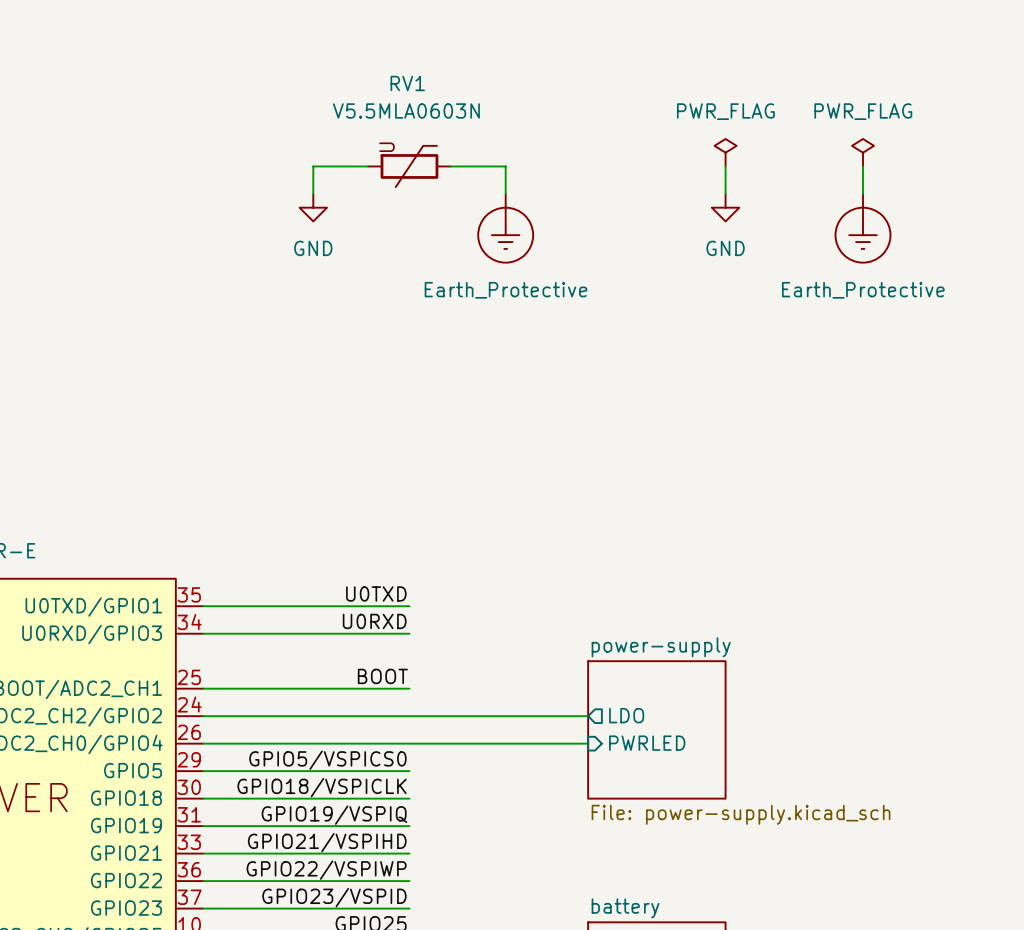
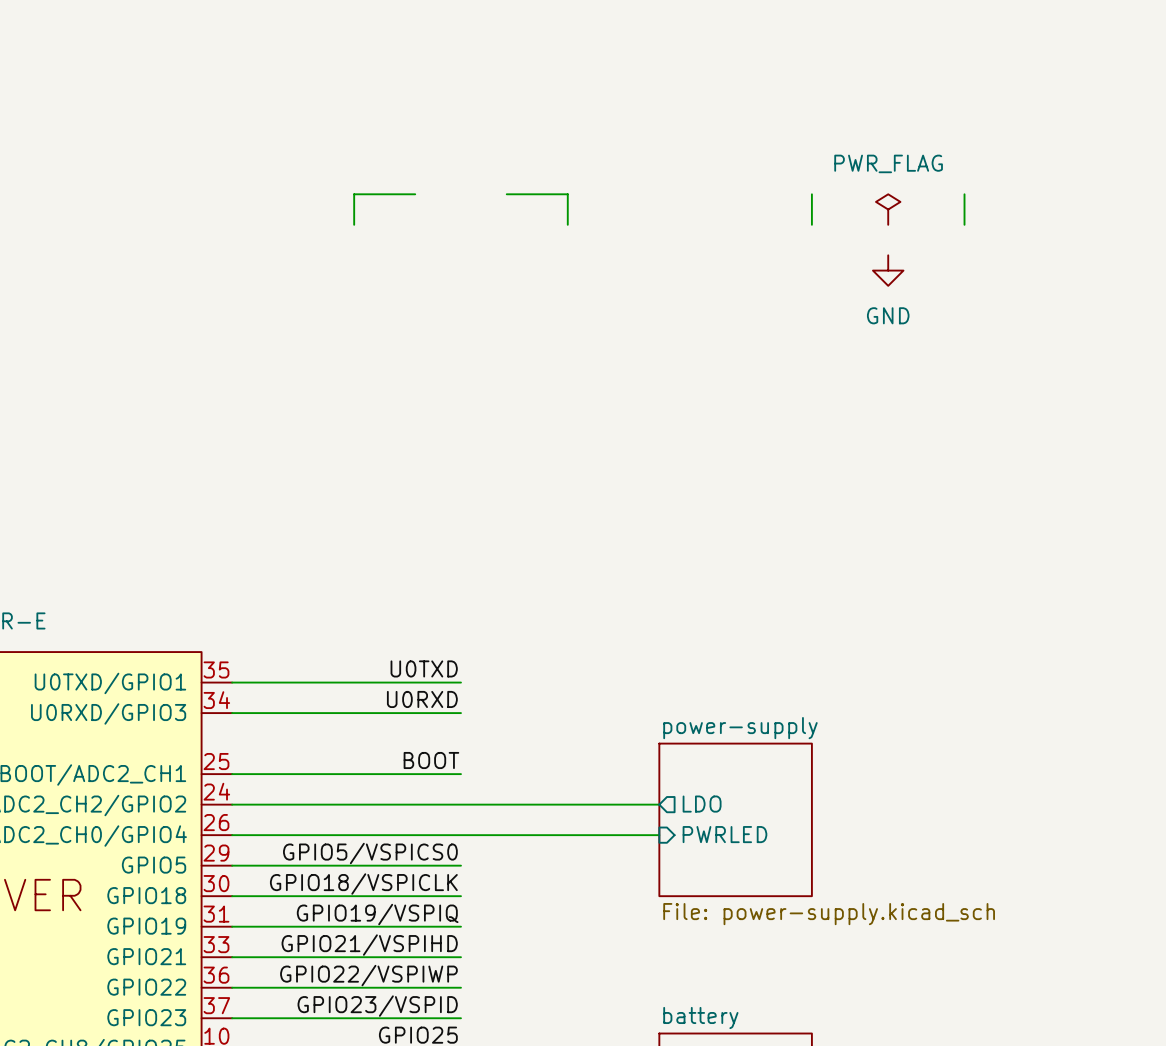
power symbol: PWR_FLAG (725, 152) -> none
power symbol: PWR_FLAG (863, 152) -> none
RV1: V5.5MLA0603N (409, 166) -> none
power symbol: none -> PWR_FLAG (888, 209)
power symbol: GND (313, 207) -> none
power symbol position: GND (725, 207) -> GND (888, 270)
power symbol: Earth_Protective (505, 228) -> none
power symbol: Earth_Protective (863, 228) -> none

